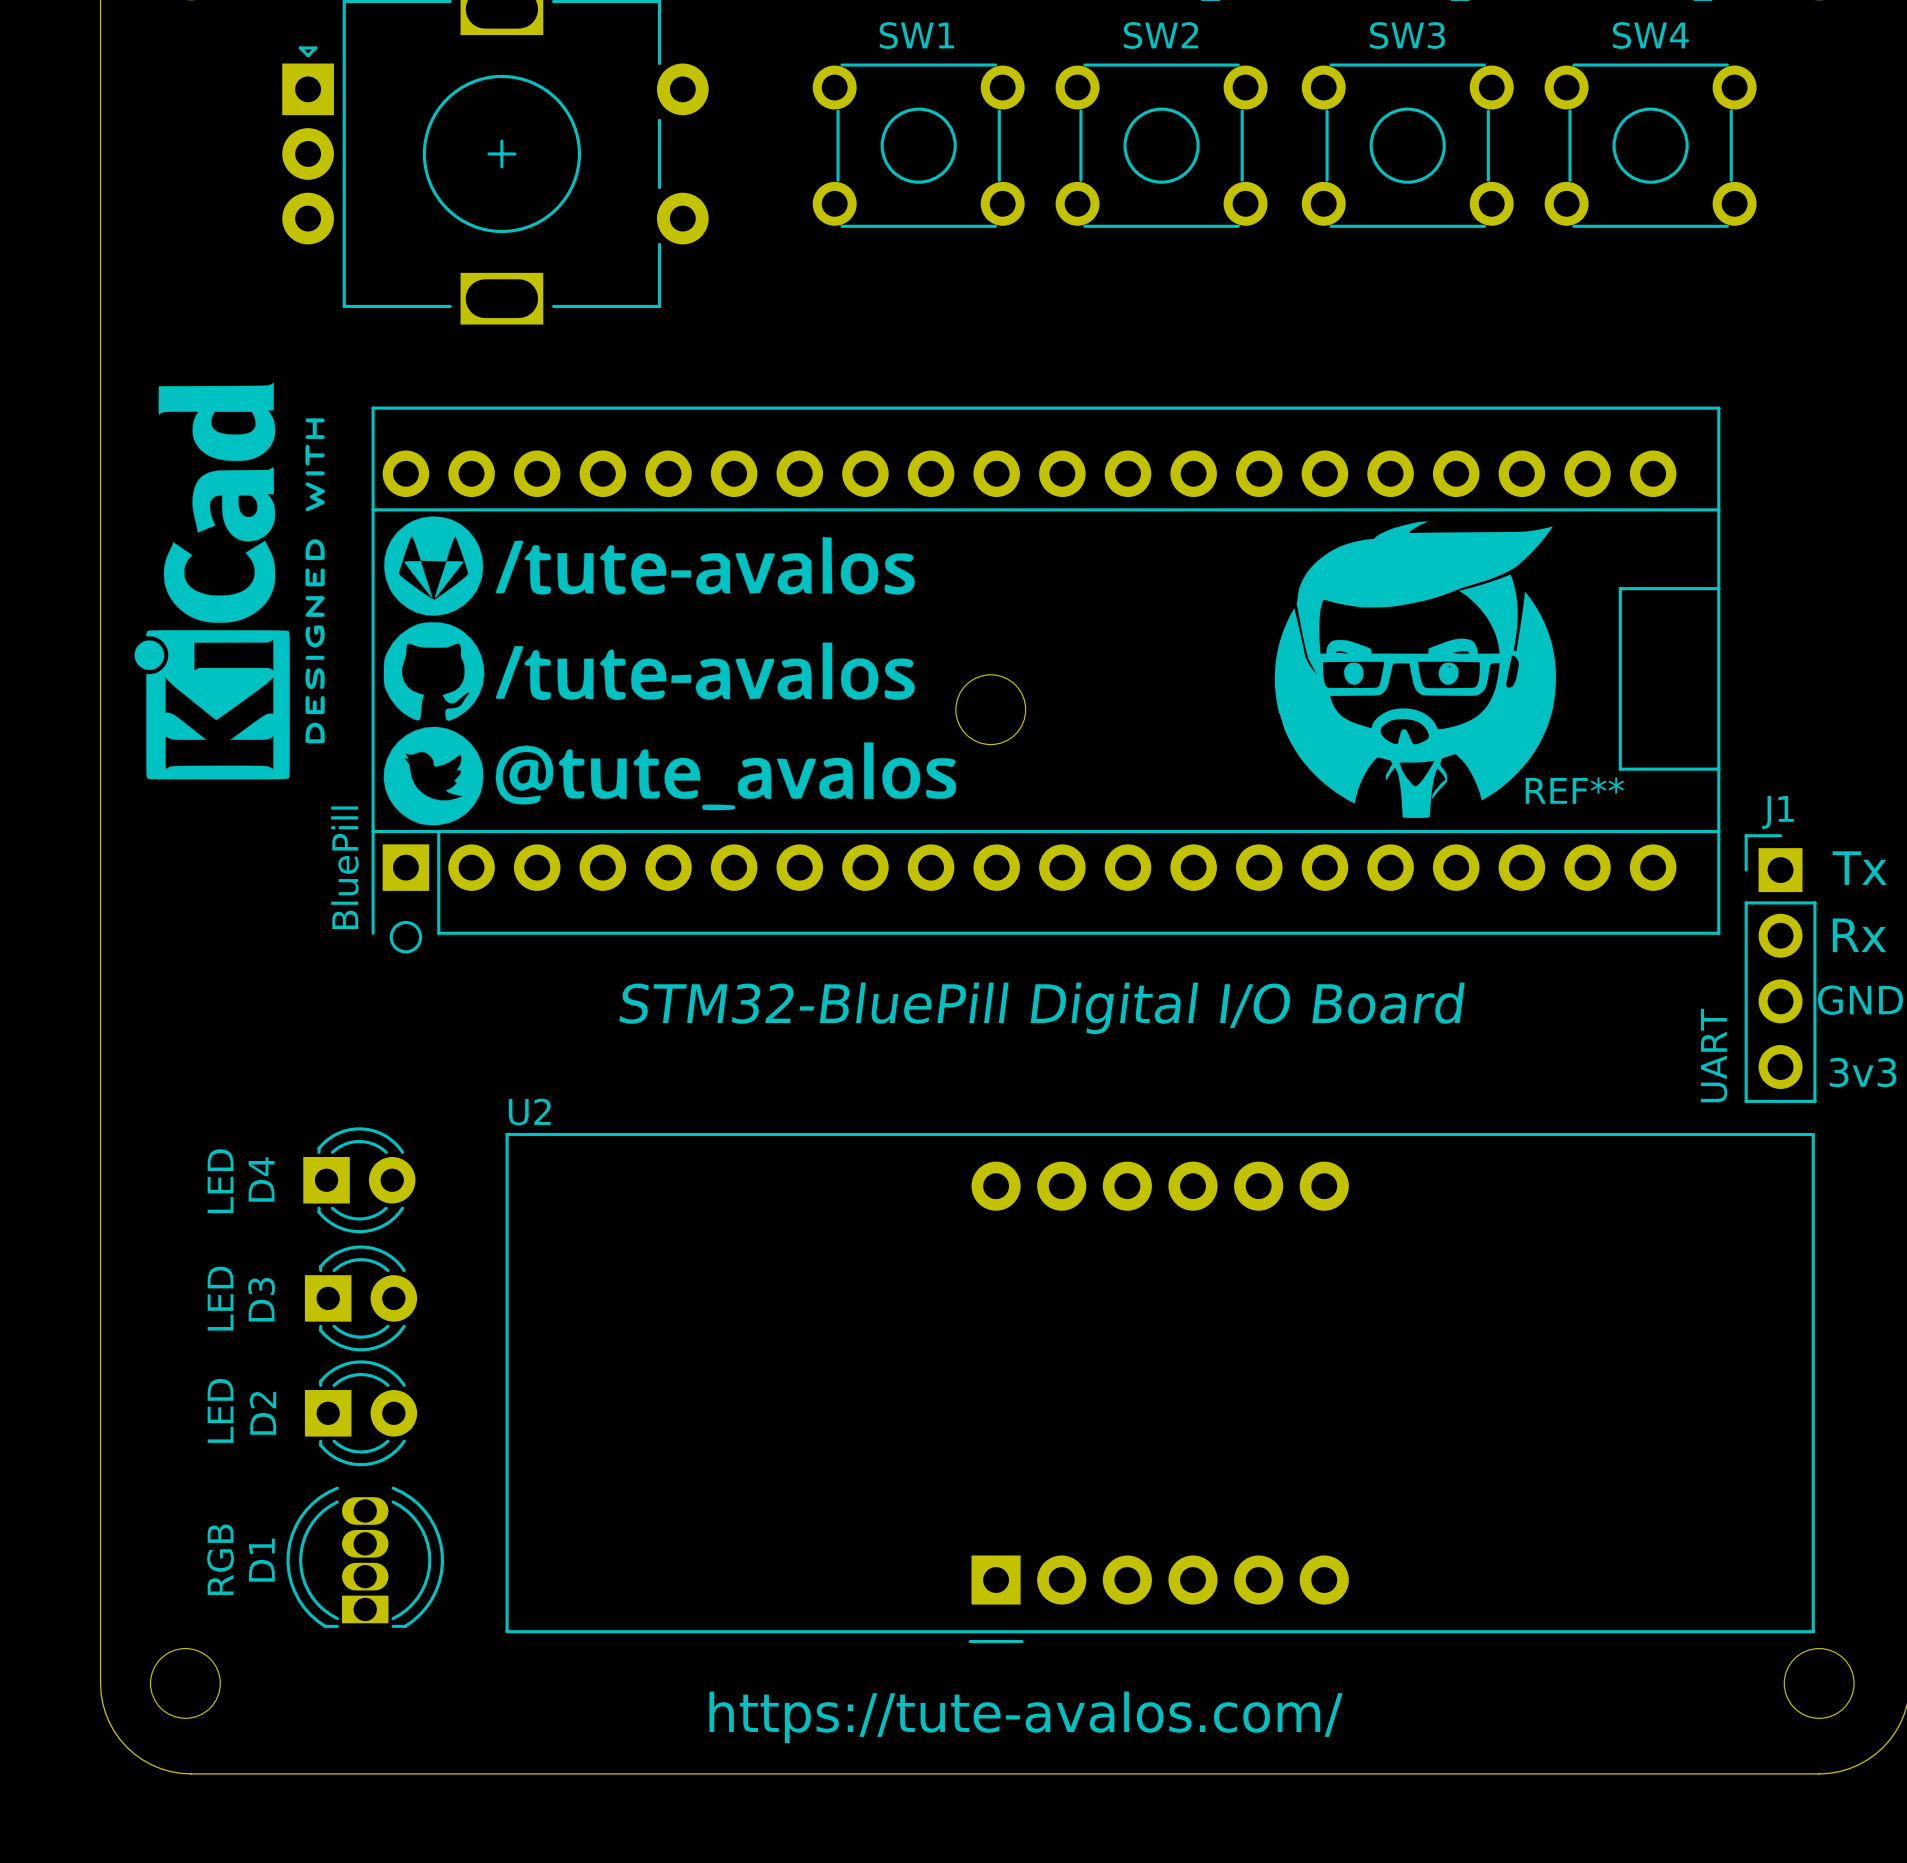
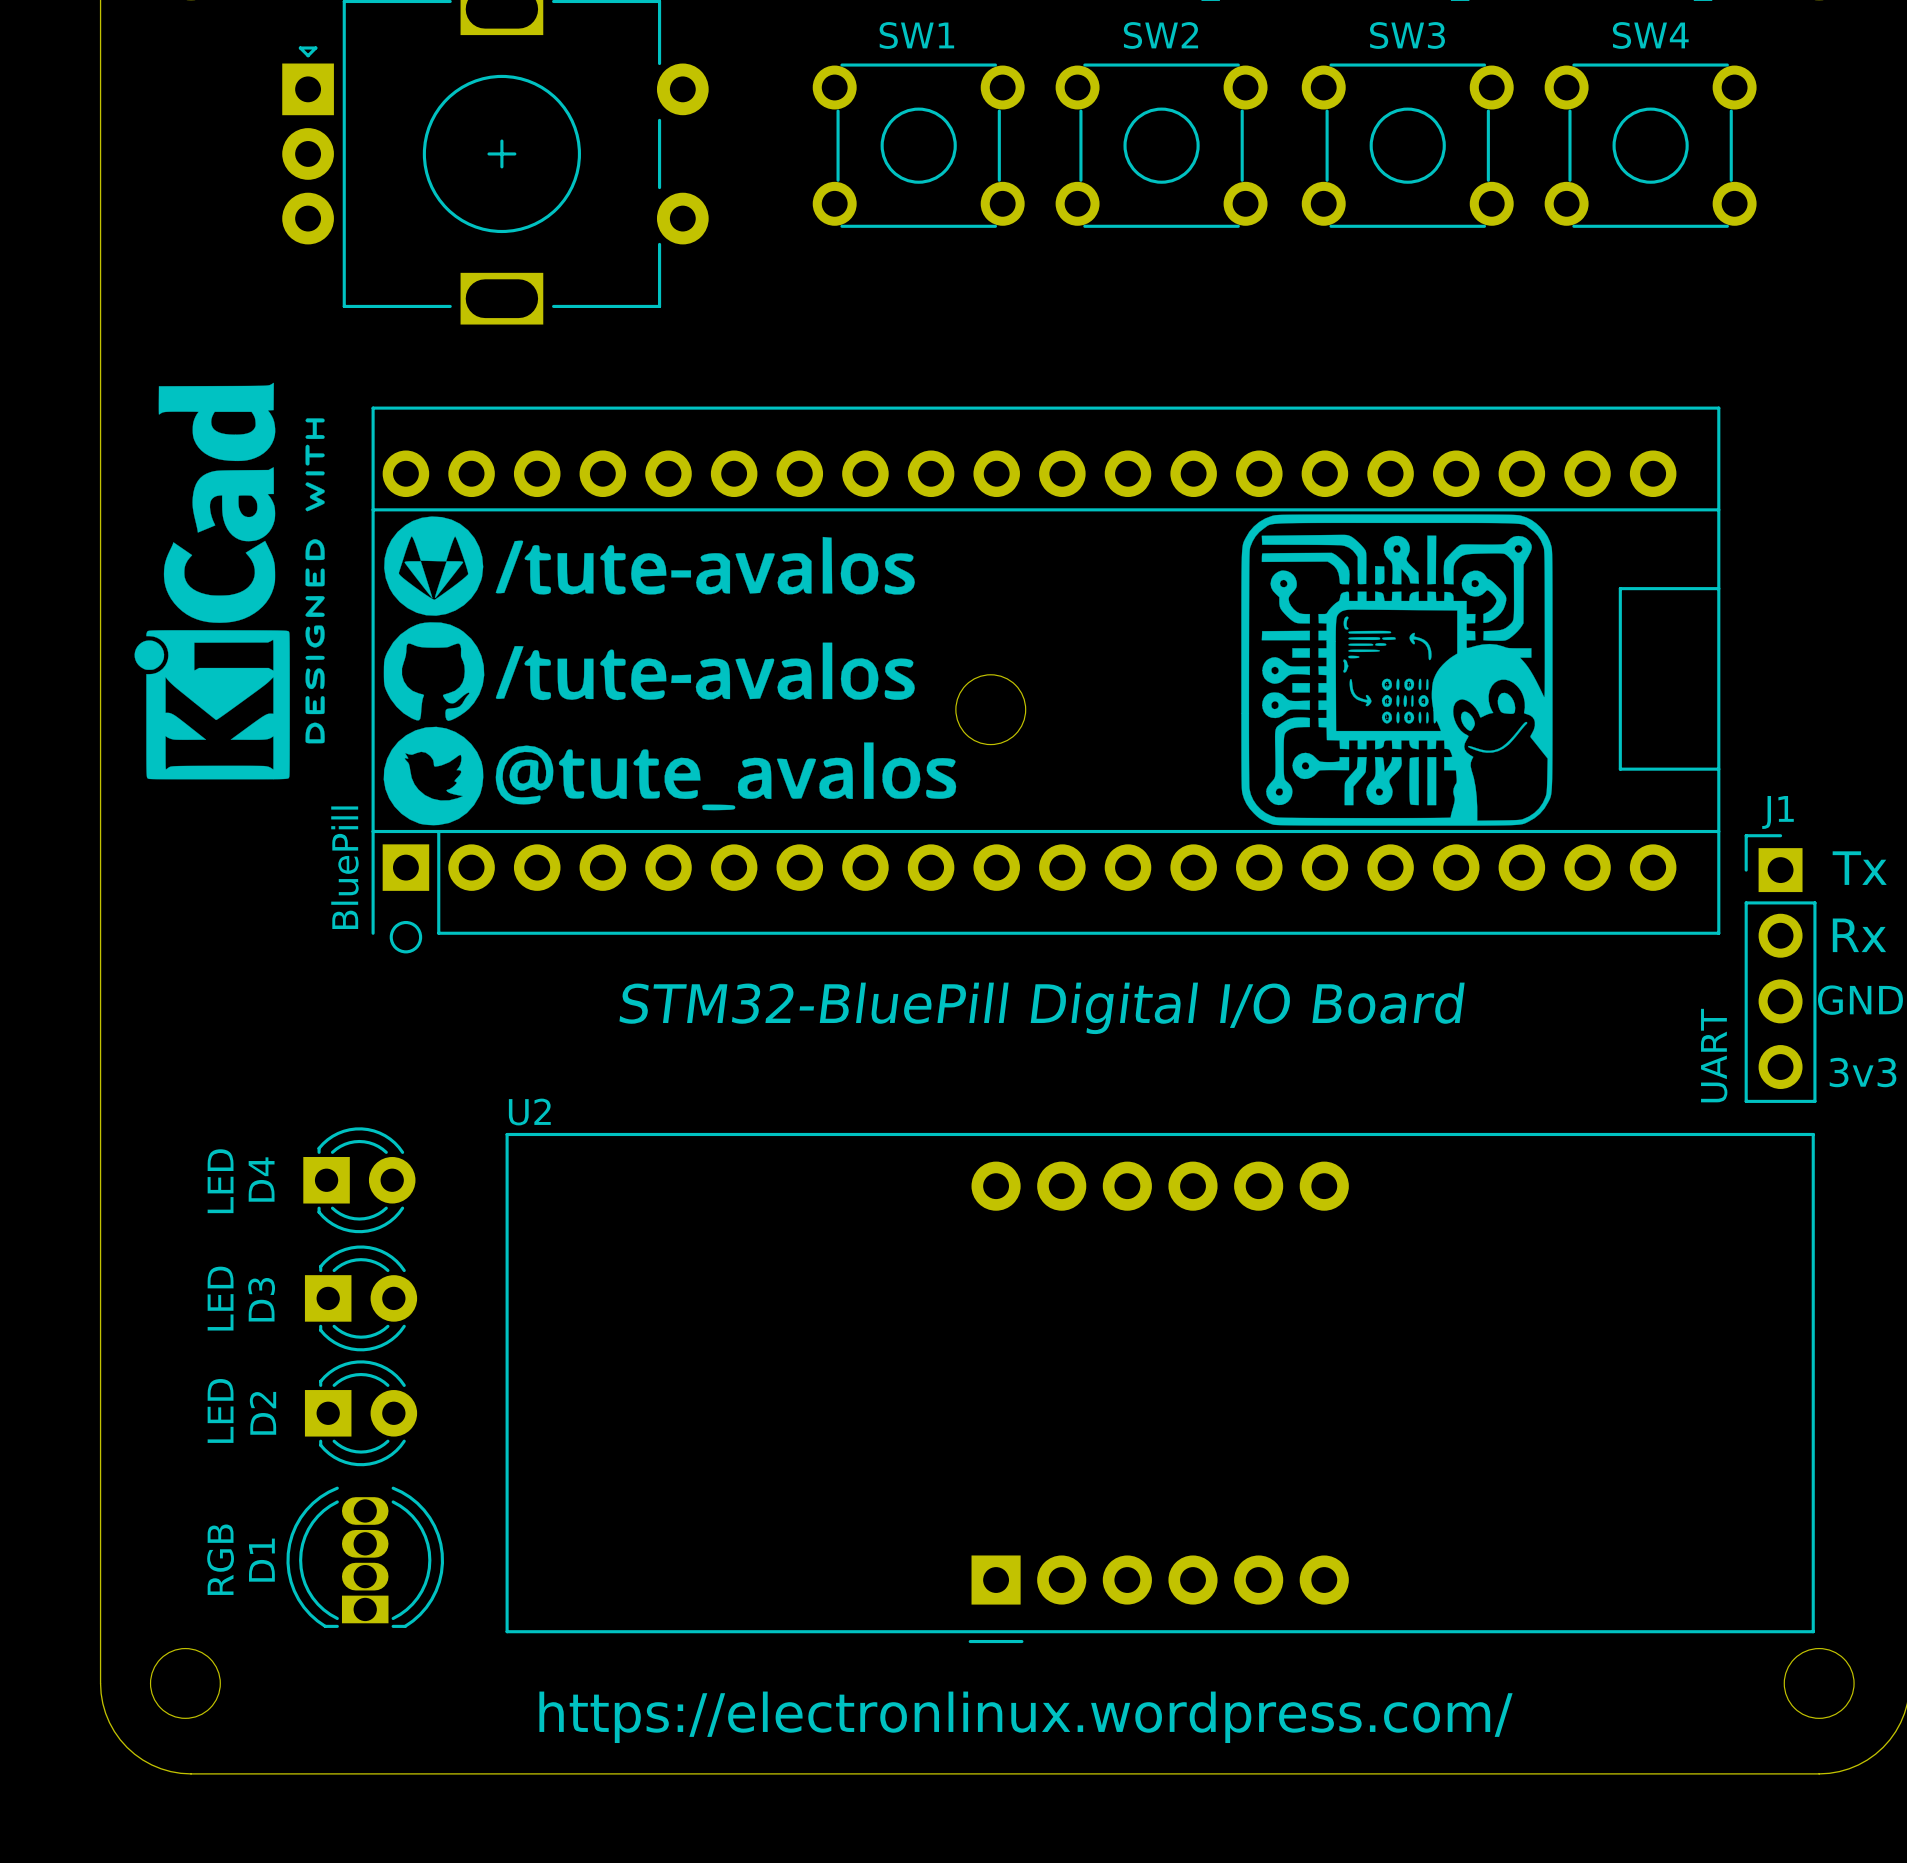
drawing: none -> [1241, 514, 1553, 826]
REF**: (1415, 669) -> none
text: https://tute-avalos.com/ (1026, 1717) -> https://electronlinux.wordpress.com/ (1026, 1717)

